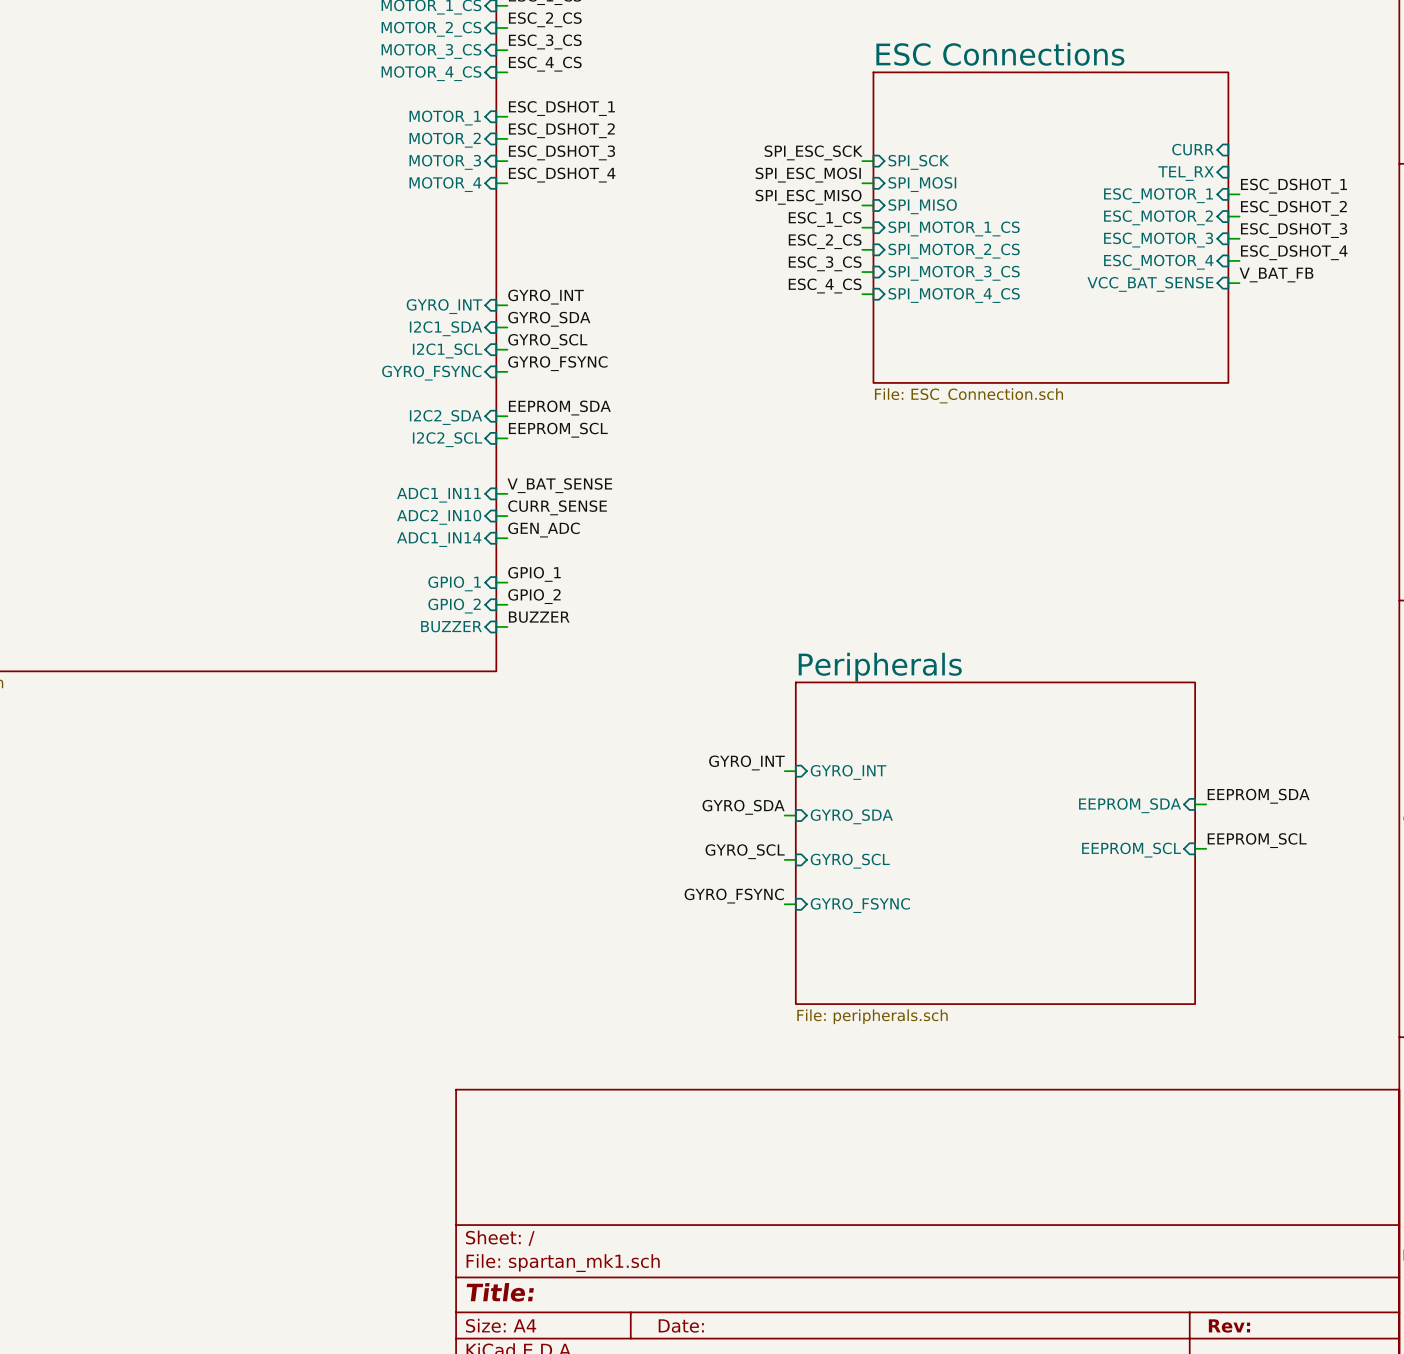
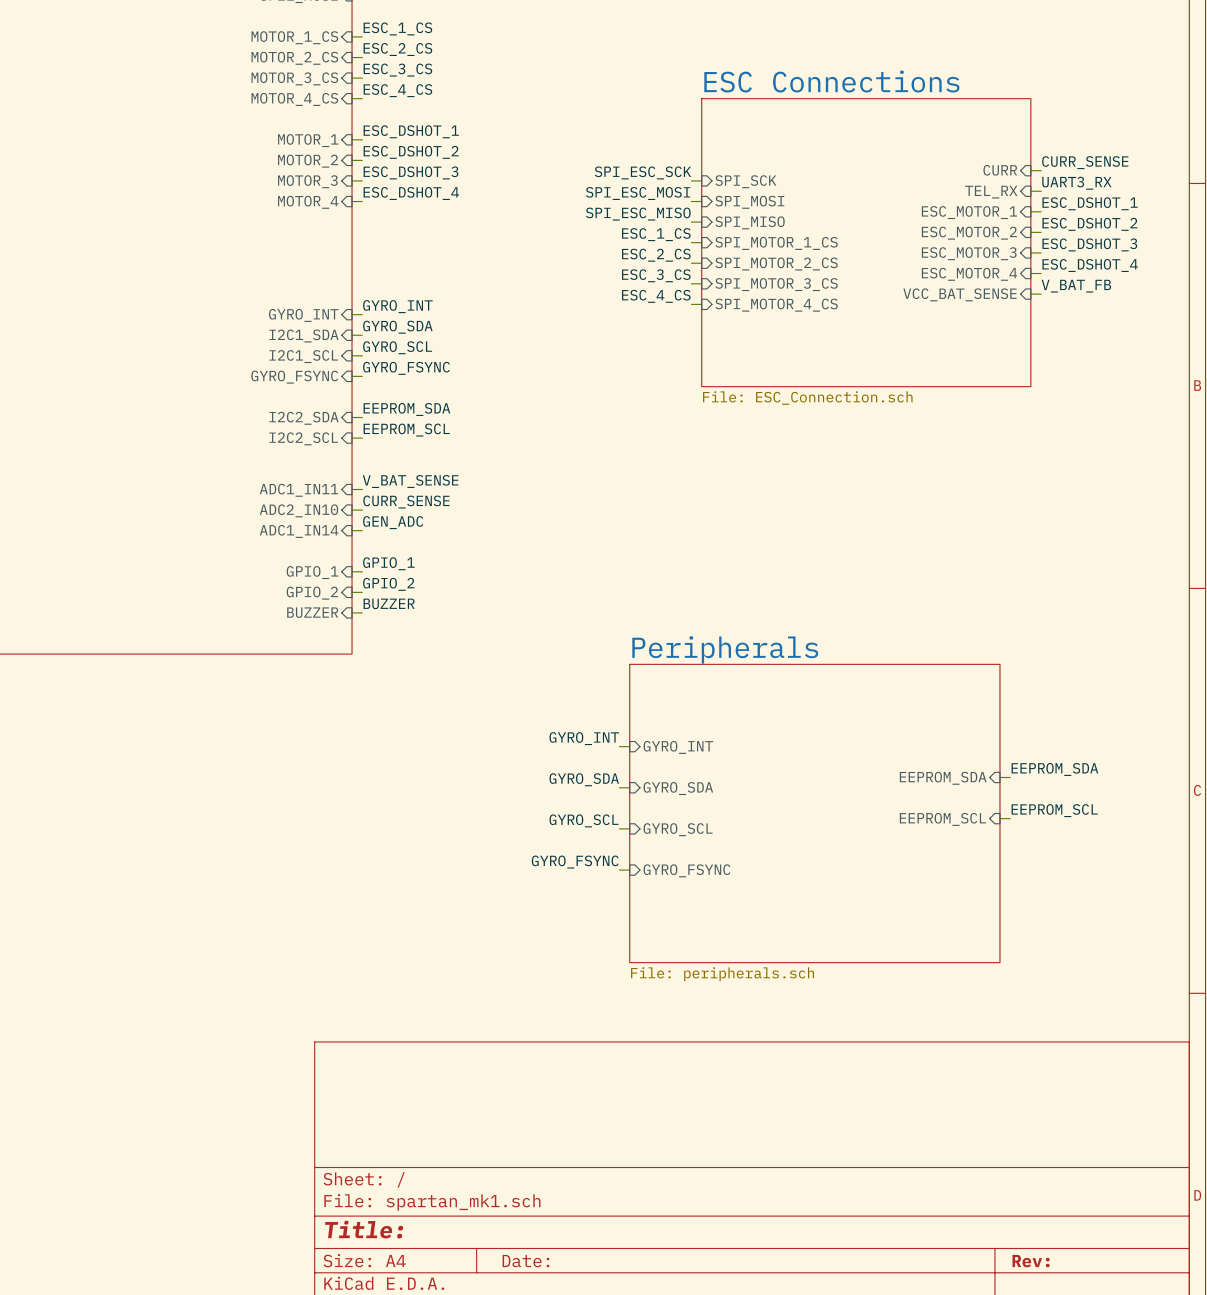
label: none -> CURR_SENSE (1085, 162)
wire: none -> (1030, 170) (1041, 170)
label: none -> UART3_RX (1076, 183)
wire: none -> (1030, 191) (1041, 191)

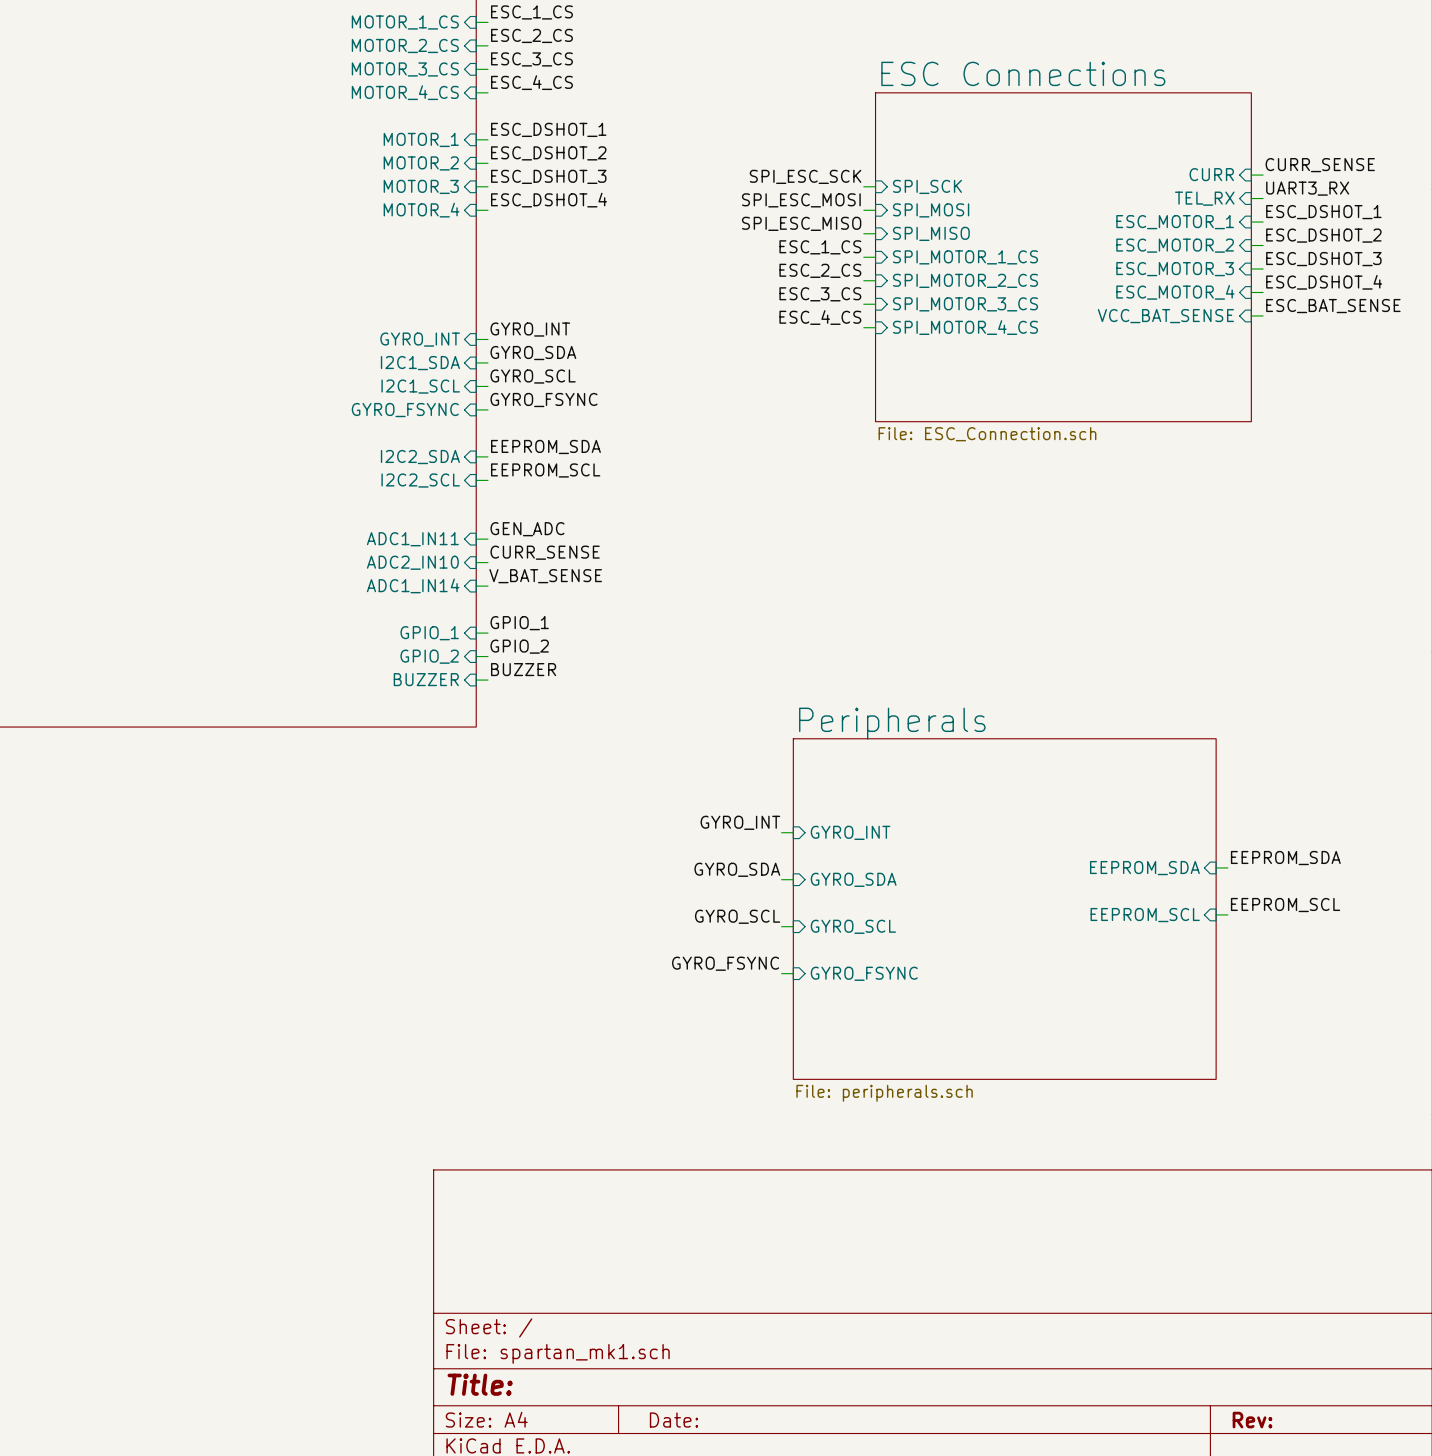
label: V_BAT_FB (1076, 286) -> ESC_BAT_SENSE (1333, 306)
label: V_BAT_SENSE (410, 481) -> GEN_ADC (527, 529)
label: GEN_ADC (393, 522) -> V_BAT_SENSE (545, 576)

